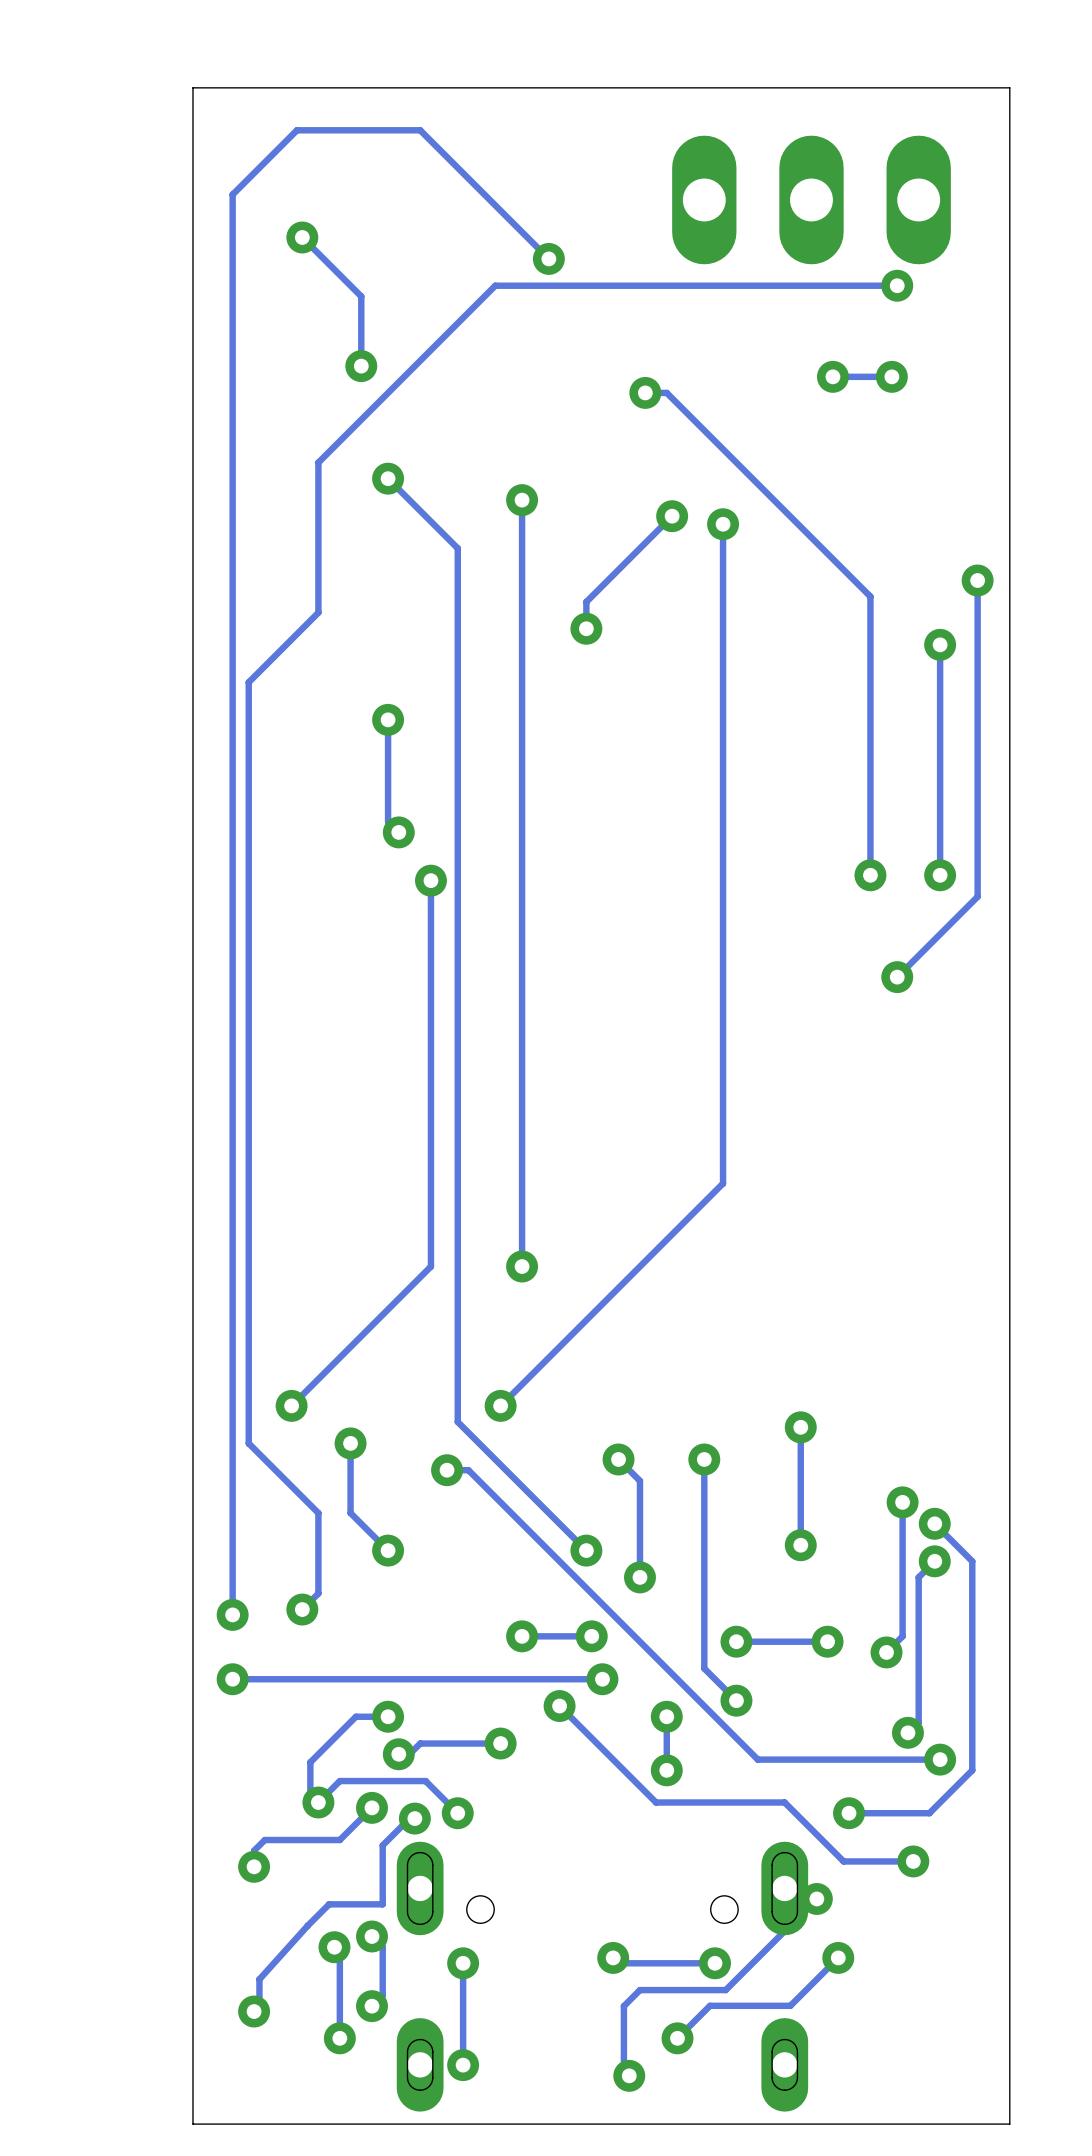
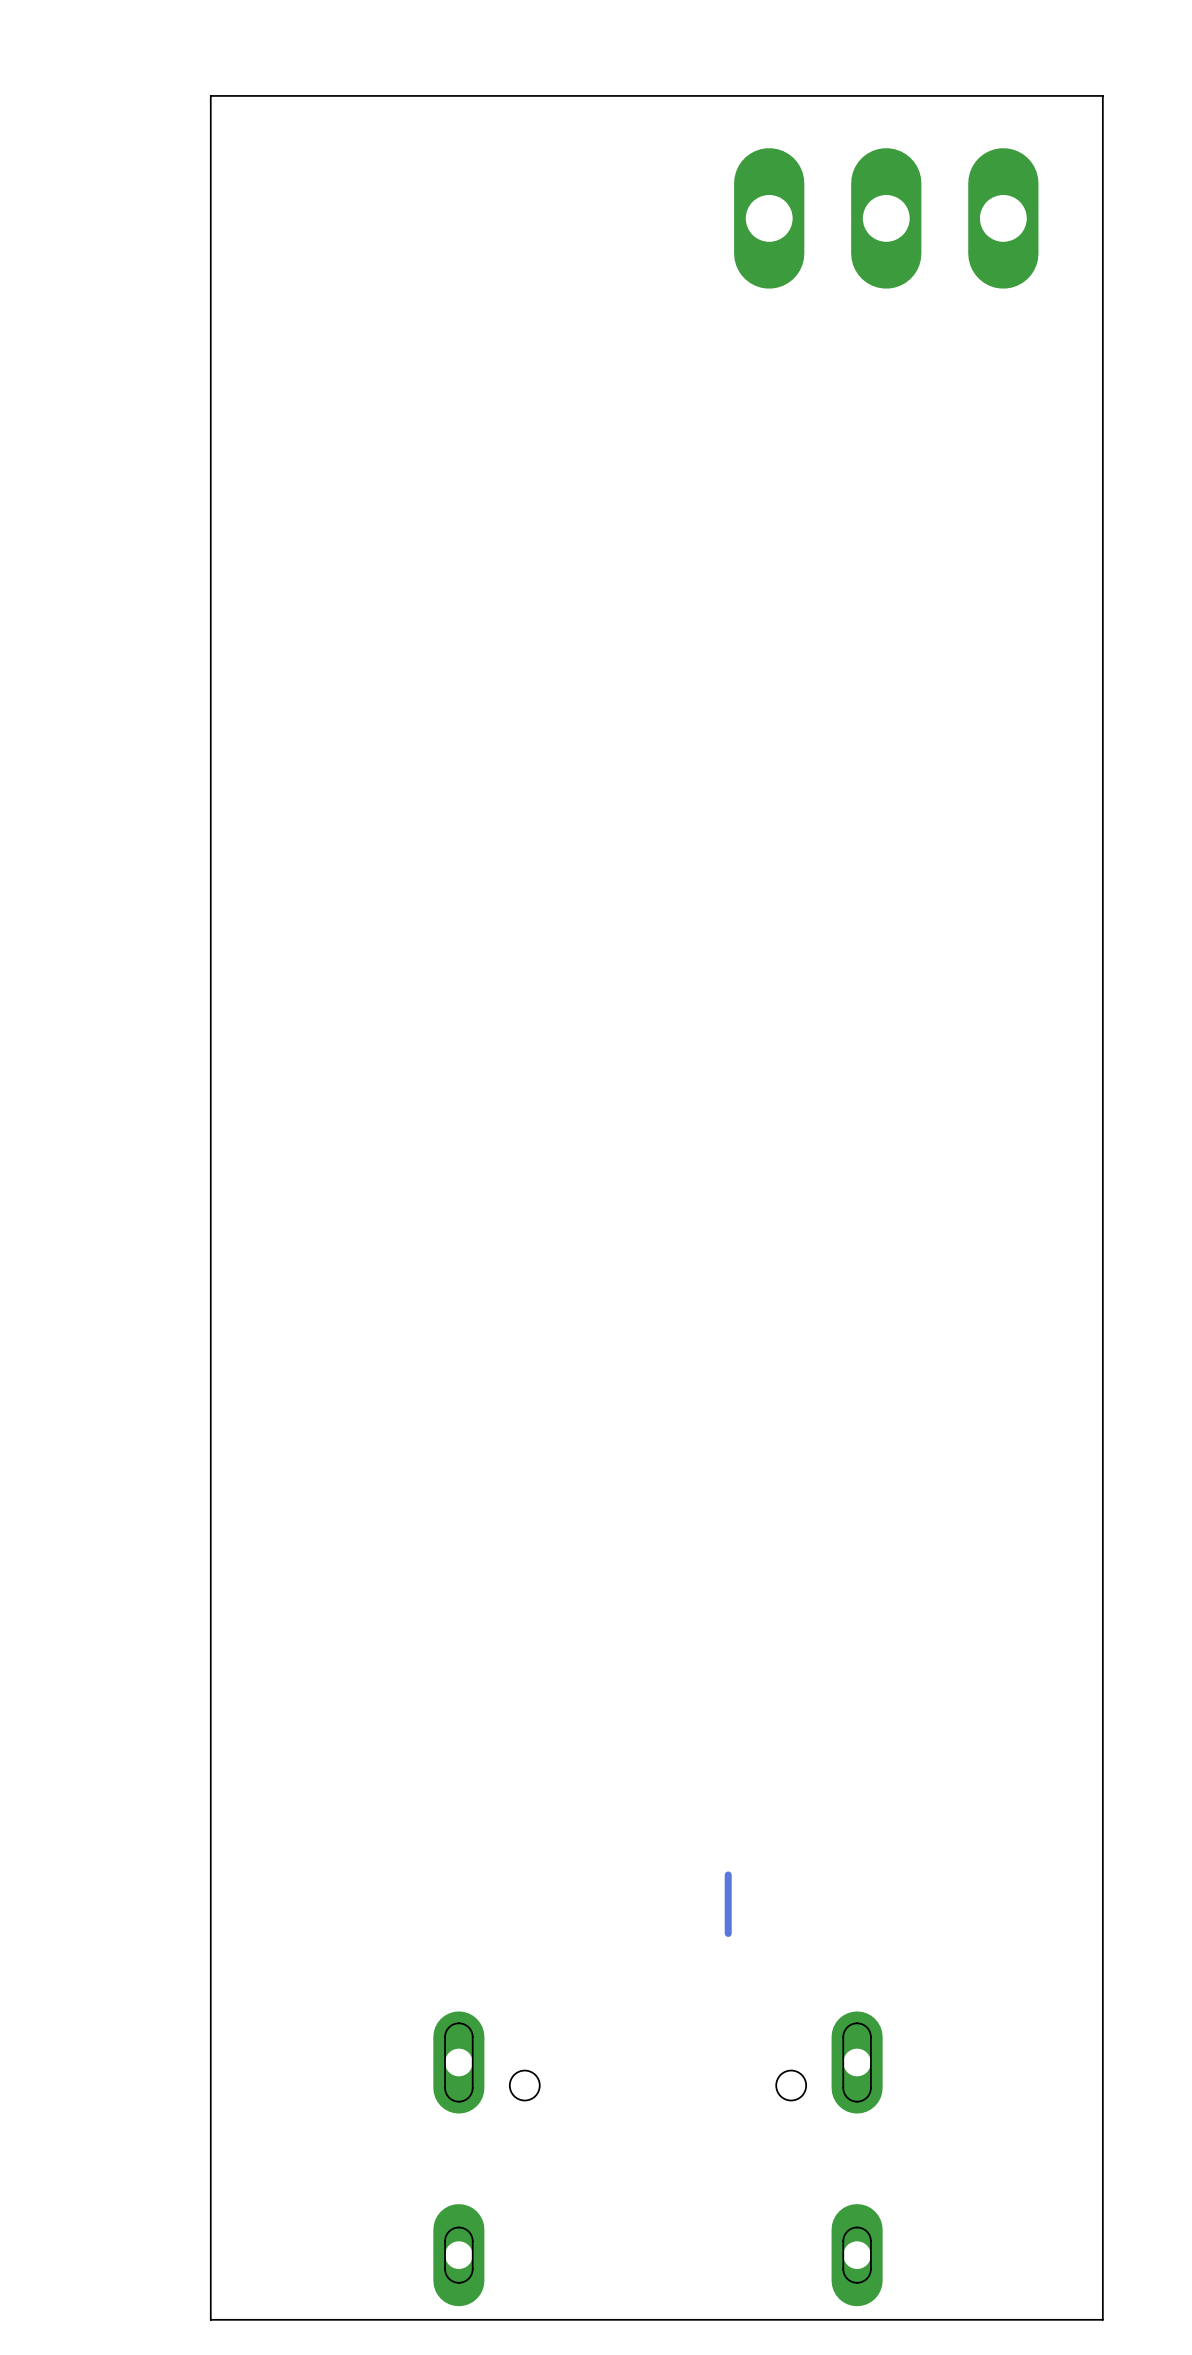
track: (302, 237) (361, 296) (361, 366) -> none
via: (302, 237) -> none
track: (548, 258) (420, 130) (296, 130) (232, 194) (232, 1614) -> none
via: (548, 258) -> none
track: (897, 285) (495, 285) (318, 462) (318, 612) (248, 682) (248, 1443) (318, 1513) (318, 1593) (302, 1609) -> none
via: (897, 285) -> none
via: (361, 366) -> none
via: (832, 376) -> none
track: (891, 376) (832, 376) -> none
via: (891, 376) -> none
track: (645, 392) (666, 392) (870, 596) (870, 875) -> none
via: (645, 392) -> none
track: (388, 478) (457, 548) (457, 1421) (586, 1550) -> none
via: (388, 478) -> none
track: (522, 500) (522, 1266) -> none
via: (522, 500) -> none
track: (672, 516) (586, 601) (586, 628) -> none
via: (672, 516) -> none
track: (723, 524) (723, 1183) (500, 1405) -> none
via: (723, 524) -> none
track: (977, 580) (977, 896) (897, 977) -> none
via: (977, 580) -> none
via: (586, 628) -> none
track: (940, 644) (940, 875) -> none
via: (940, 644) -> none
track: (388, 719) (388, 821) (398, 832) -> none
via: (388, 719) -> none
via: (398, 832) -> none
via: (870, 875) -> none
via: (940, 875) -> none
track: (430, 880) (430, 1266) (291, 1405) -> none
via: (430, 880) -> none
via: (897, 977) -> none
via: (522, 1266) -> none
via: (291, 1405) -> none
via: (500, 1405) -> none
track: (800, 1427) (800, 1545) -> none
via: (800, 1427) -> none
track: (350, 1443) (350, 1513) (388, 1550) -> none
via: (350, 1443) -> none
track: (618, 1459) (639, 1480) (639, 1577) -> none
via: (618, 1459) -> none
track: (704, 1459) (704, 1668) (736, 1700) -> none
via: (704, 1459) -> none
track: (447, 1470) (468, 1470) (757, 1759) (940, 1759) -> none
via: (447, 1470) -> none
track: (902, 1502) (902, 1636) (886, 1652) -> none
via: (902, 1502) -> none
track: (934, 1523) (972, 1561) (972, 1770) (929, 1813) (849, 1813) -> none
via: (934, 1523) -> none
via: (800, 1545) -> none
via: (388, 1550) -> none
via: (586, 1550) -> none
track: (934, 1561) (918, 1577) (918, 1722) (907, 1732) -> none
via: (934, 1561) -> none
via: (639, 1577) -> none
via: (302, 1609) -> none
via: (232, 1614) -> none
via: (522, 1636) -> none
track: (591, 1636) (522, 1636) -> none
via: (591, 1636) -> none
via: (736, 1641) -> none
track: (827, 1641) (736, 1641) -> none
via: (827, 1641) -> none
via: (886, 1652) -> none
via: (232, 1679) -> none
track: (602, 1679) (232, 1679) -> none
via: (602, 1679) -> none
via: (736, 1700) -> none
track: (559, 1706) (656, 1802) (784, 1802) (843, 1861) (913, 1861) -> none
via: (559, 1706) -> none
track: (388, 1716) (355, 1716) (310, 1762) (310, 1794) (318, 1802) (339, 1781) (425, 1781) (457, 1813) -> none
via: (388, 1716) -> none
via: (666, 1716) -> none
via: (907, 1732) -> none
track: (500, 1743) (420, 1743) (404, 1759) (398, 1754) -> none
via: (500, 1743) -> none
via: (398, 1754) -> none
via: (940, 1759) -> none
via: (666, 1770) -> none
via: (318, 1802) -> none
track: (372, 1807) (339, 1840) (264, 1840) (254, 1850) (254, 1866) -> none
via: (372, 1807) -> none
via: (457, 1813) -> none
via: (849, 1813) -> none
track: (414, 1818) (409, 1818) (382, 1845) (382, 1904) (329, 1904) (259, 1979) (259, 2011) (254, 2011) -> none
via: (414, 1818) -> none
via: (913, 1861) -> none
via: (254, 1866) -> none
track: (816, 1898) (725, 1990) (639, 1990) (623, 2006) (623, 2070) (629, 2075) -> none
via: (816, 1898) -> none
track: (372, 1936) (382, 1947) (382, 1995) (372, 2006) -> none
via: (372, 1936) -> none
track: (334, 1947) (339, 1952) (339, 2038) -> none
via: (334, 1947) -> none
track: (613, 1957) (618, 1963) (715, 1963) -> none
via: (613, 1957) -> none
track: (838, 1957) (790, 2005) (710, 2005) (677, 2038) -> none
via: (838, 1957) -> none
track: (463, 1963) (463, 2065) -> none
via: (463, 1963) -> none
via: (715, 1963) -> none
via: (372, 2006) -> none
via: (254, 2011) -> none
via: (339, 2038) -> none
via: (677, 2038) -> none
via: (463, 2065) -> none
via: (629, 2075) -> none

